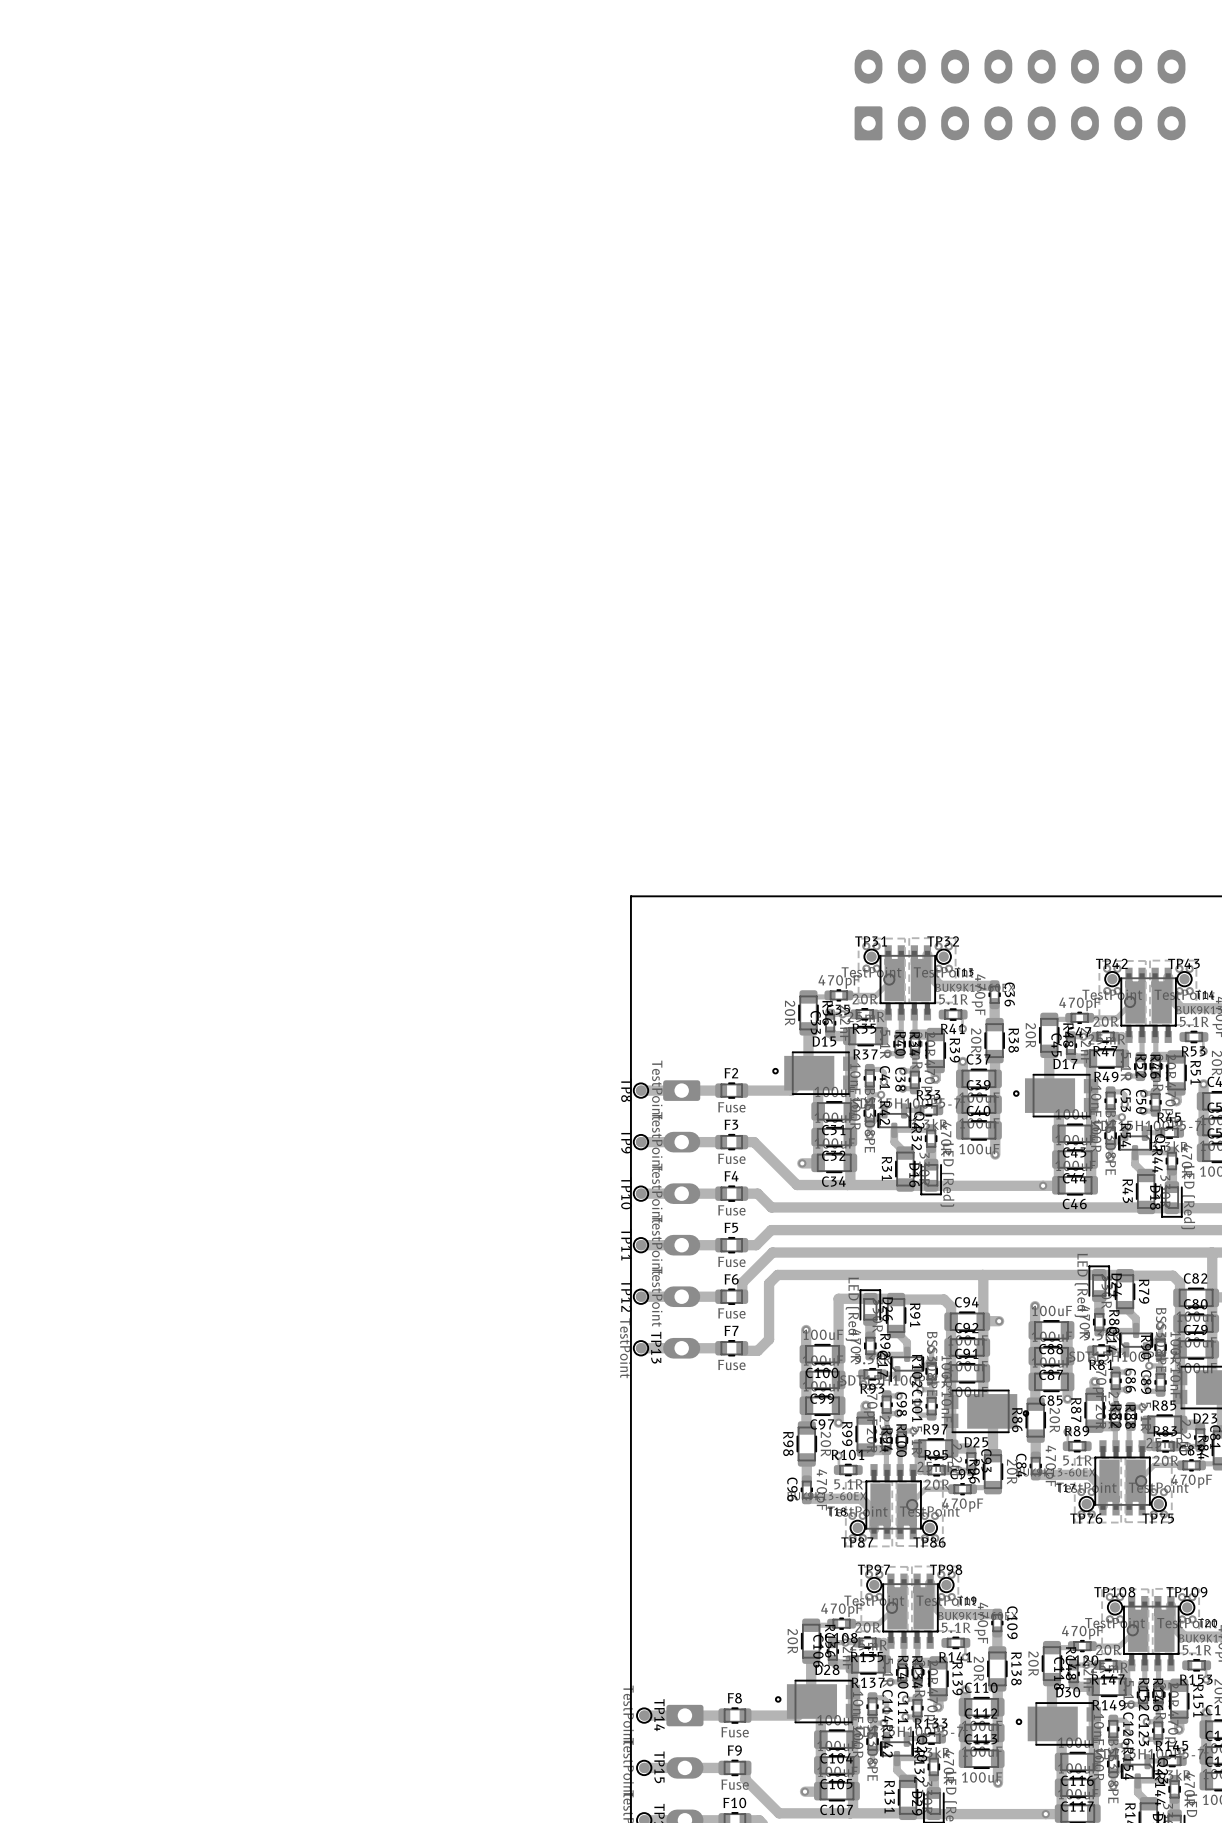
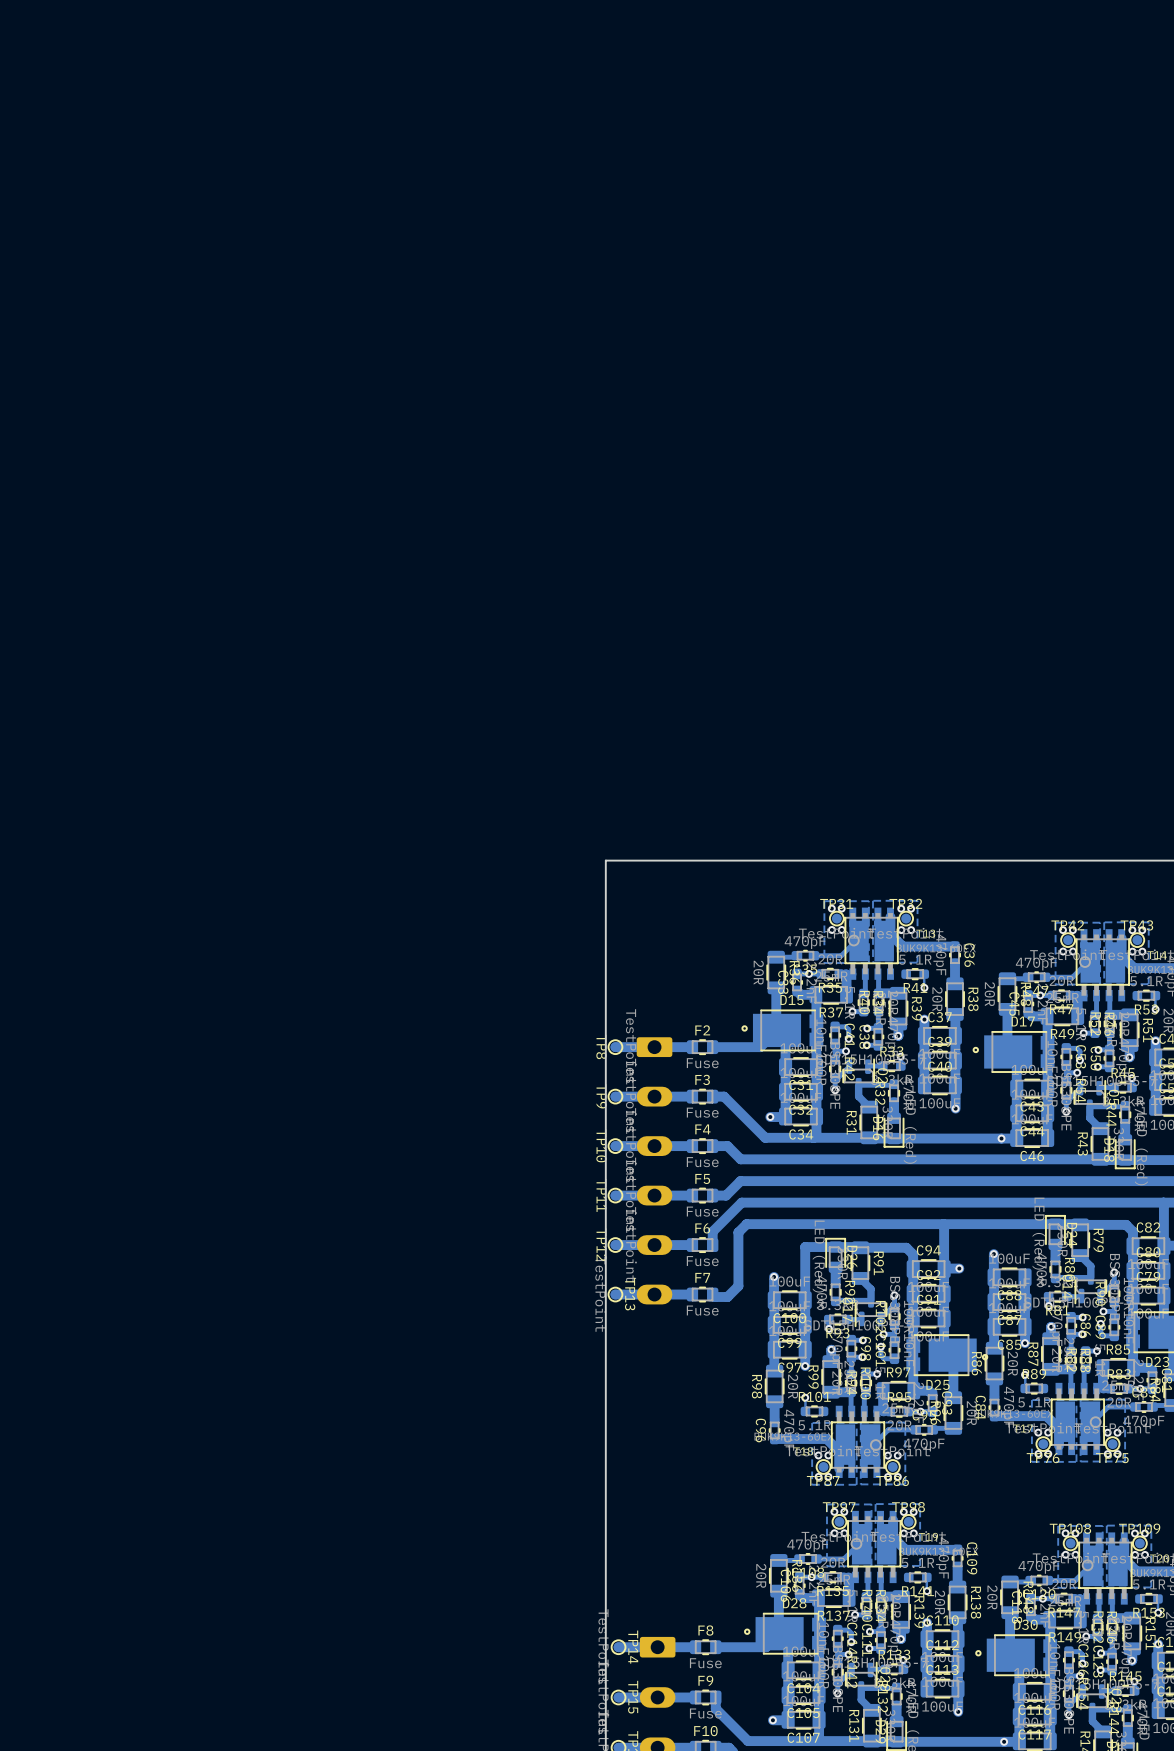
part: (1020, 95) -> none

